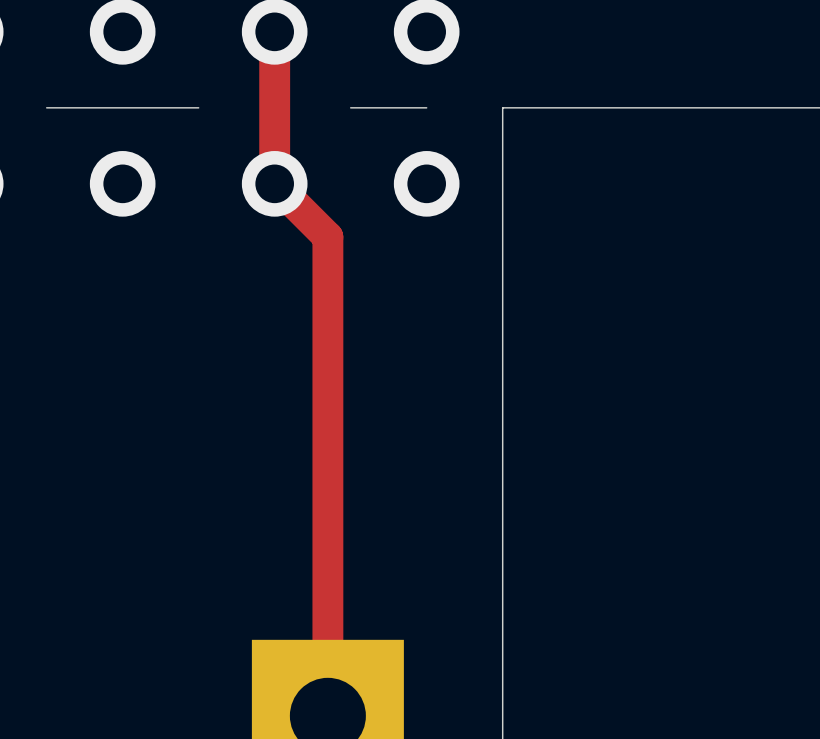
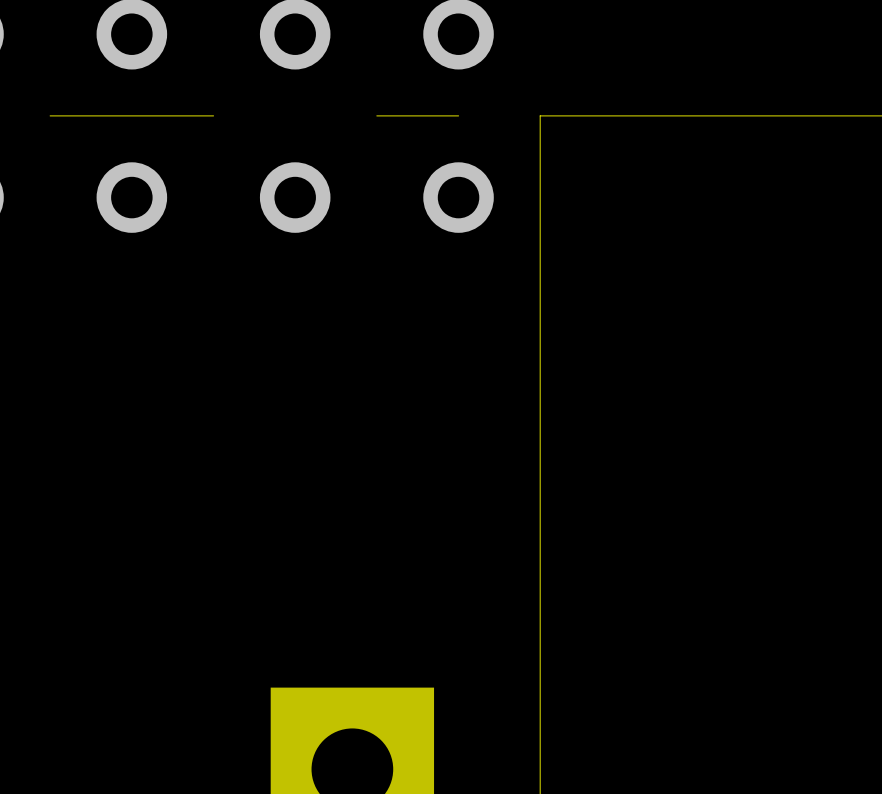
track: (274, 31) (274, 183) (327, 237) (327, 715) -> none

